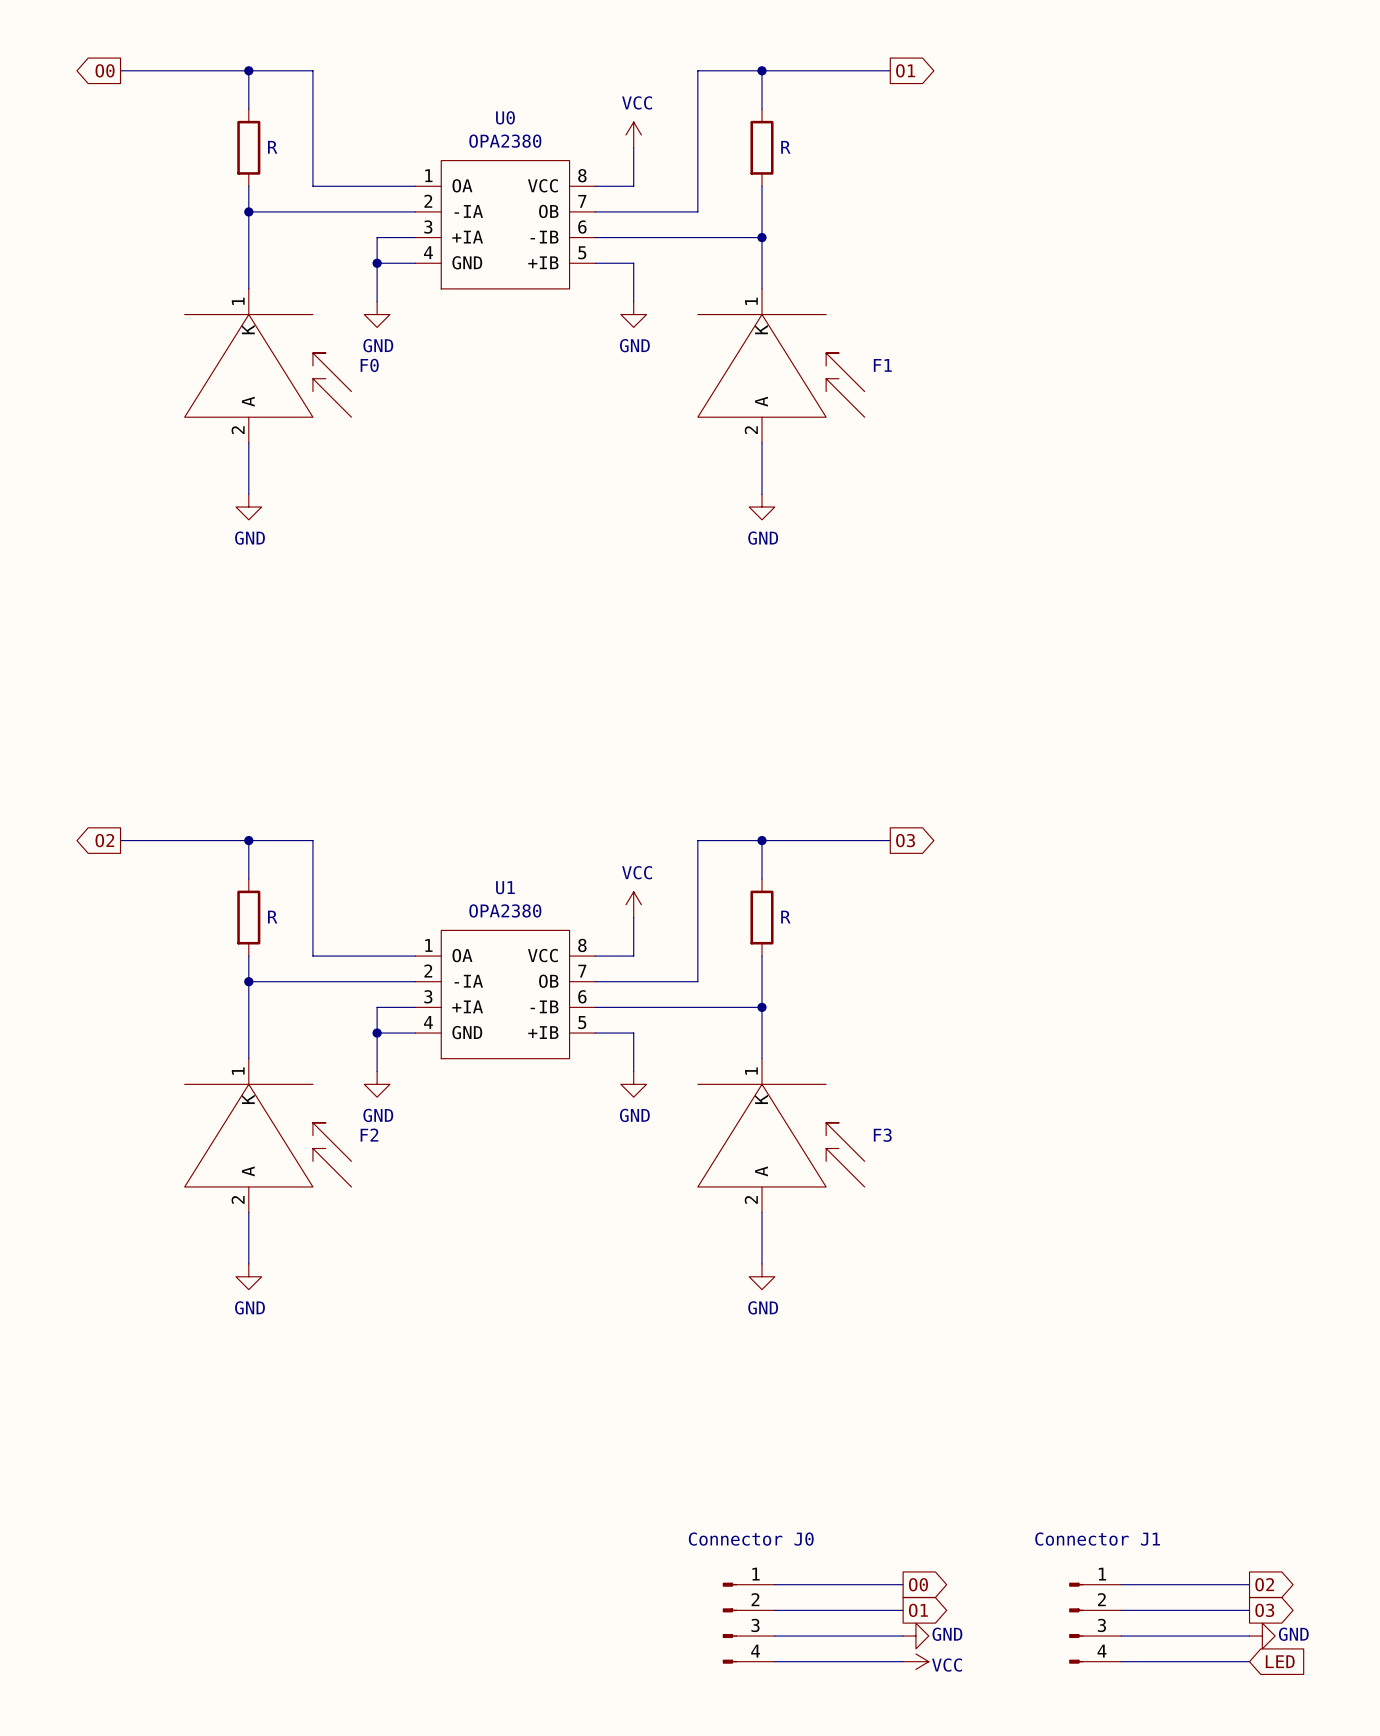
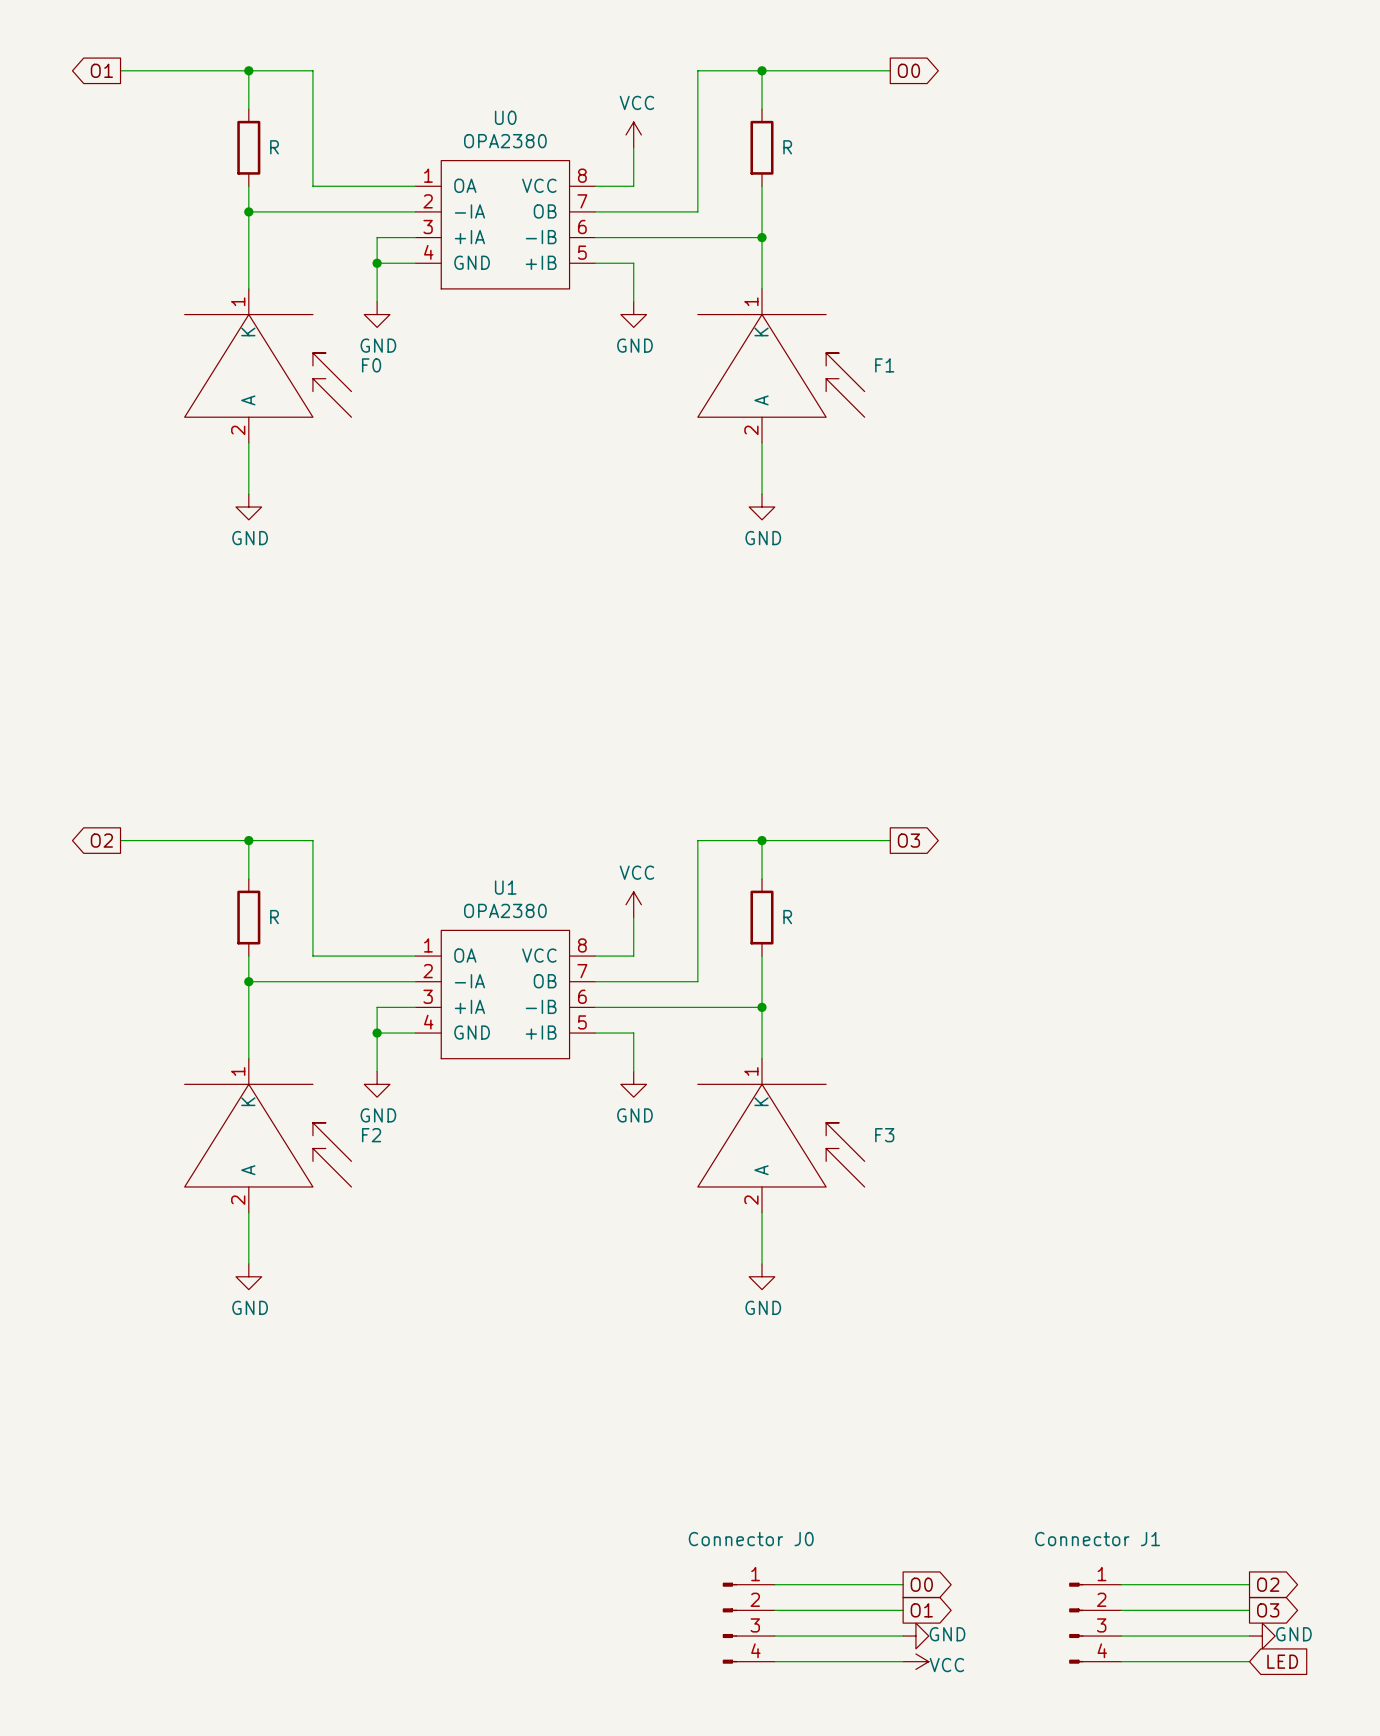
global label: O0 (105, 70) -> O1 (101, 70)
global label: O1 (905, 70) -> O0 (908, 70)

